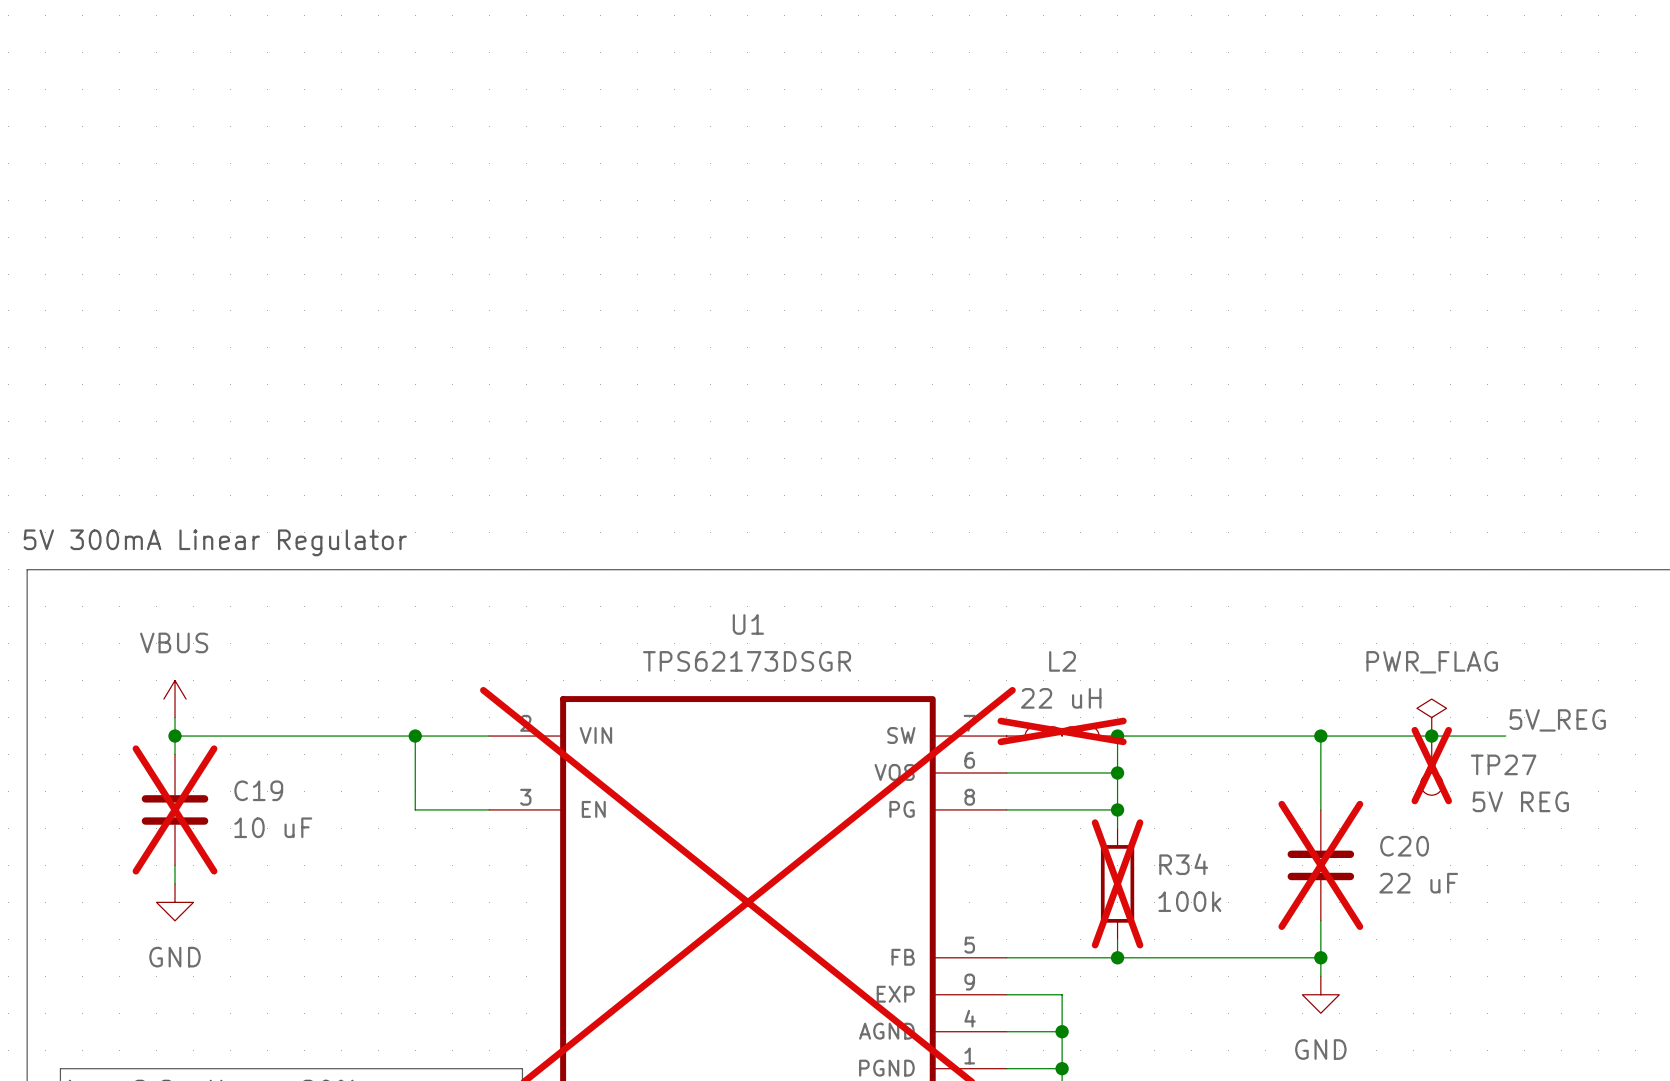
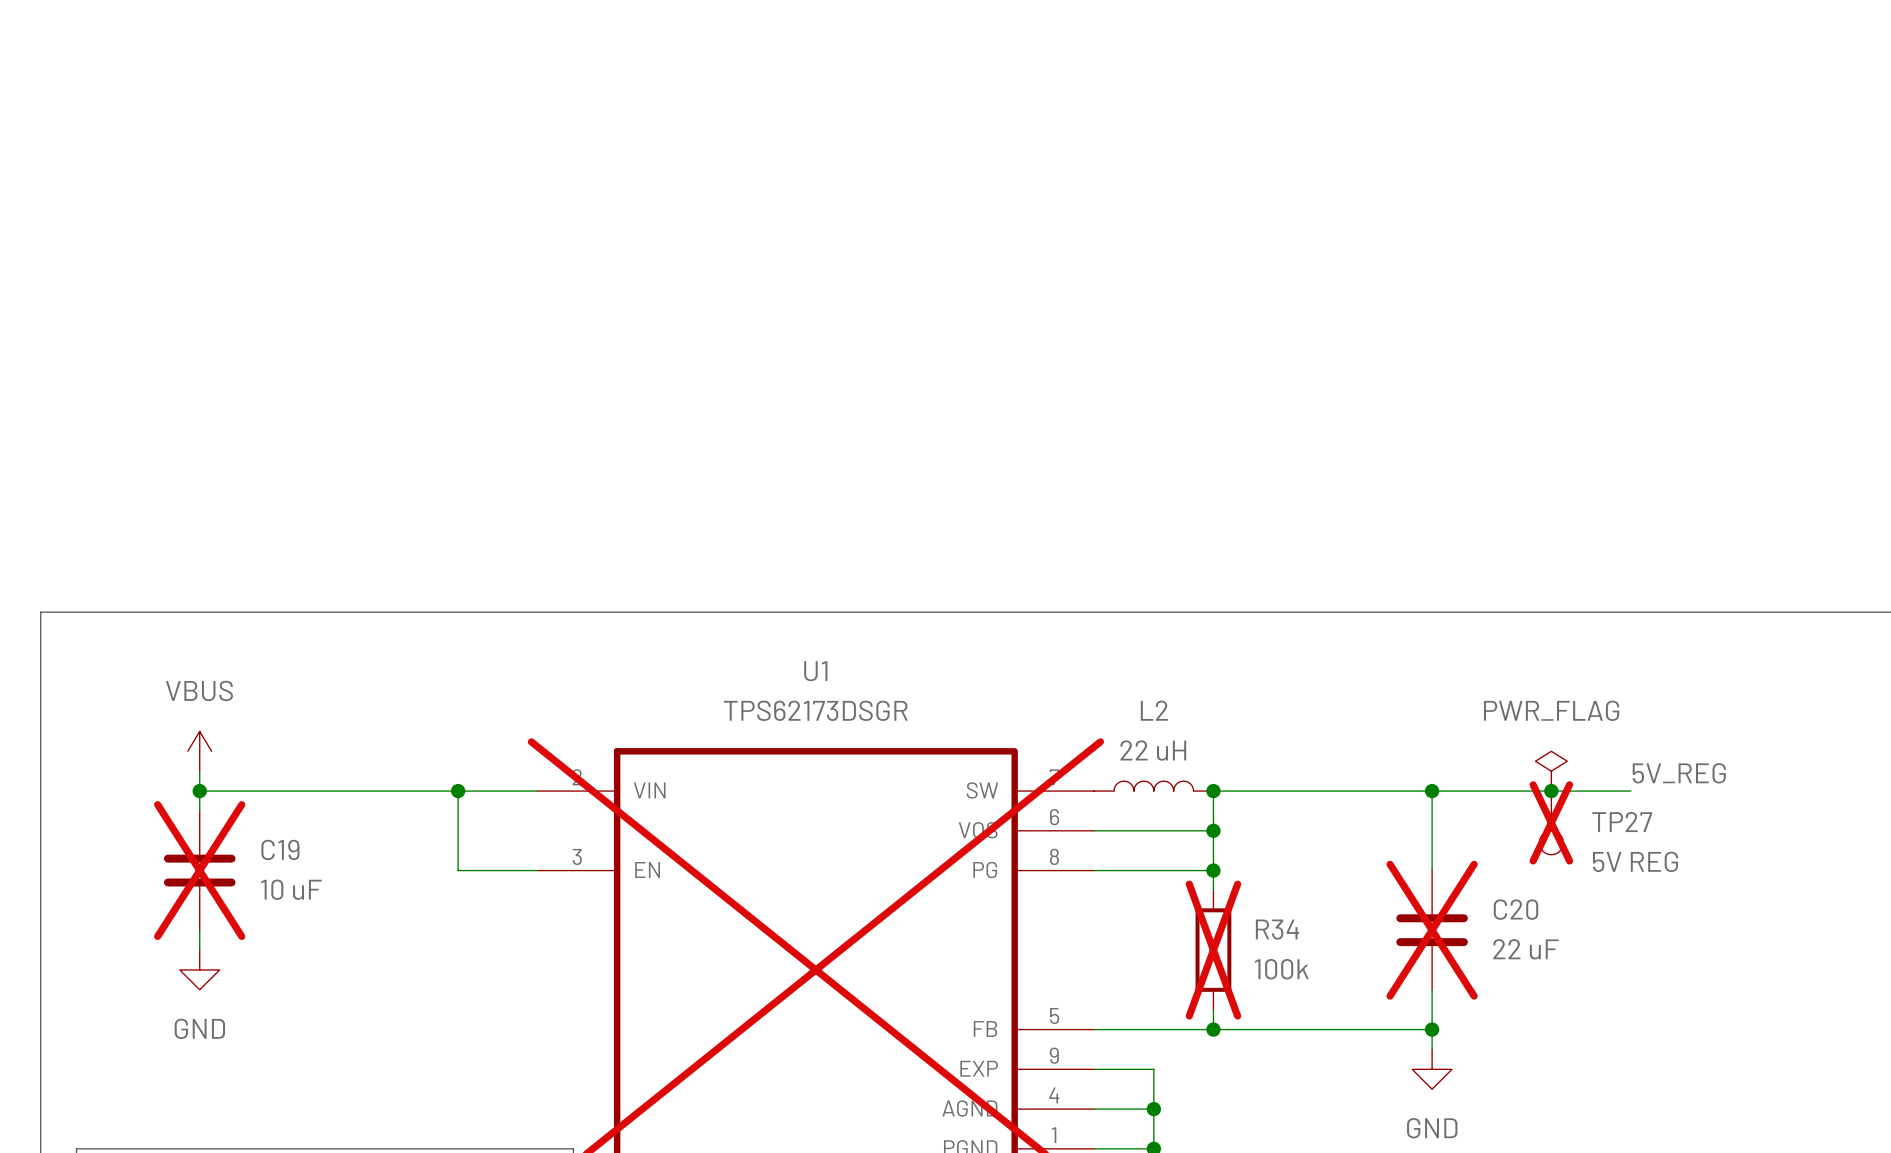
text: 5V 300mA Linear Regulator (215, 542) -> none
L2 do-not-place cross: (1062, 731) -> none

